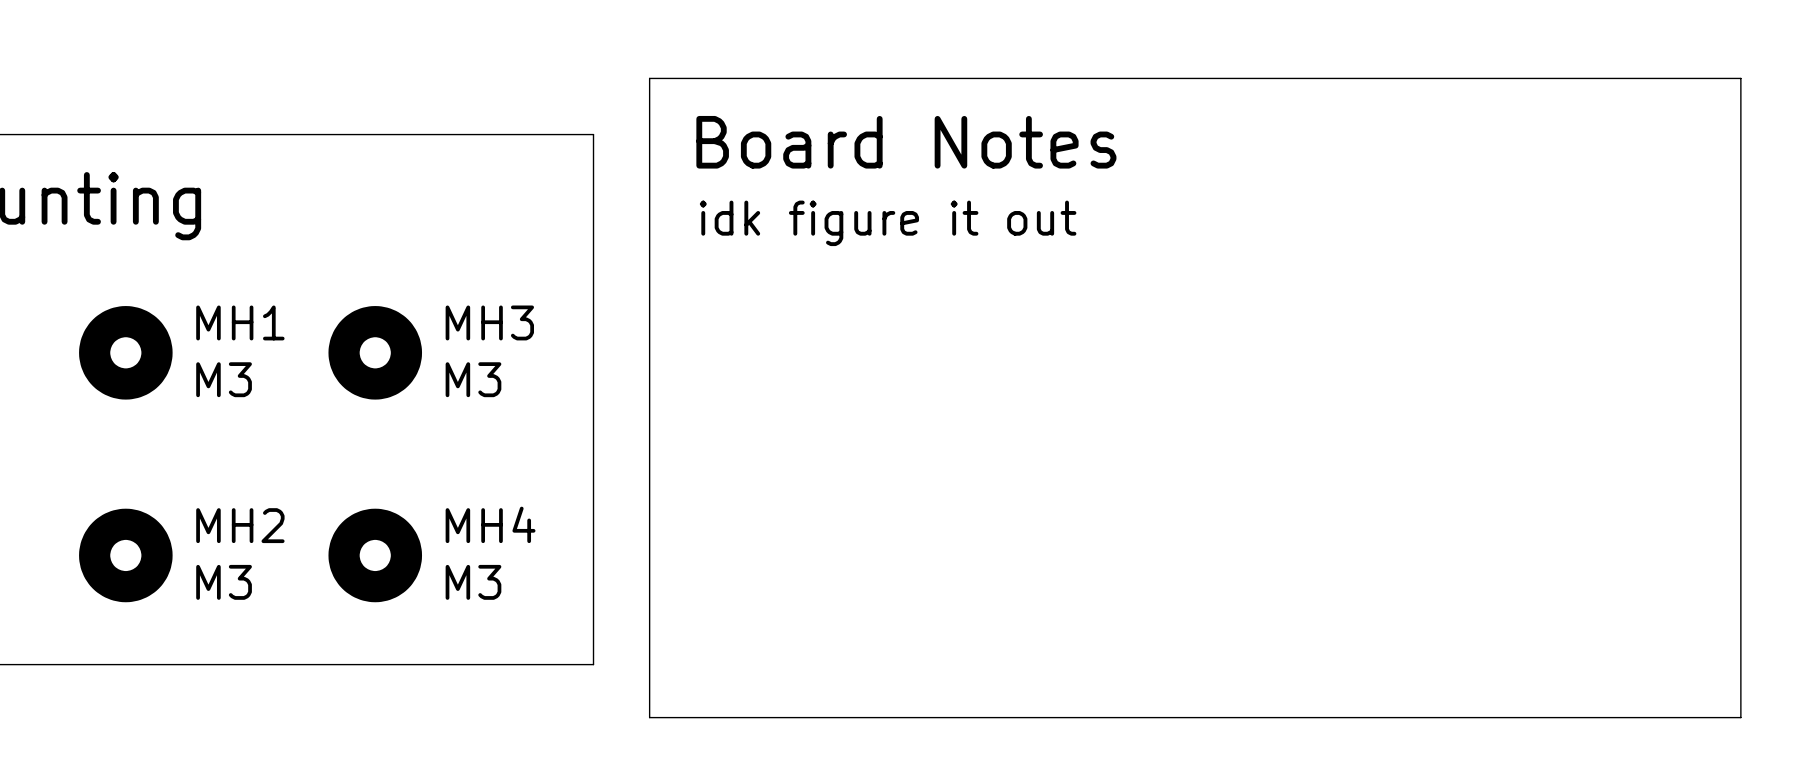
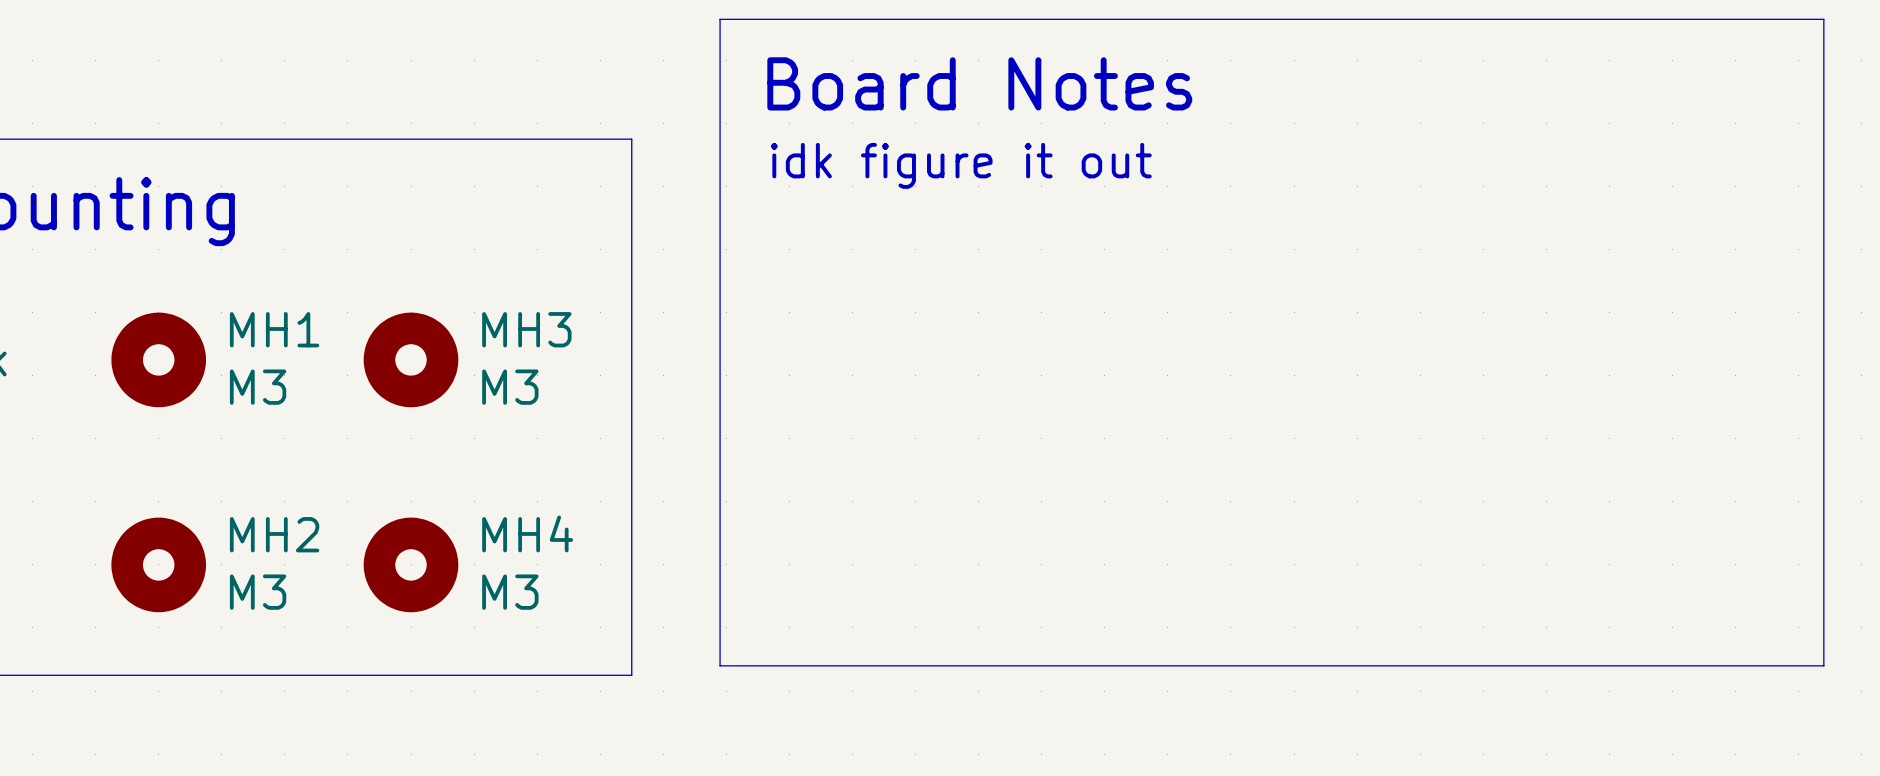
line: (649, 78) (1740, 78) (1740, 717) (649, 717) (649, 78) -> (720, 19) (720, 665) (1823, 665) (1823, 19) (720, 19)
text position: Board Notes (906, 142) -> Board Notes (979, 83)
text position: idk figure it out (888, 223) -> idk figure it out (961, 165)

